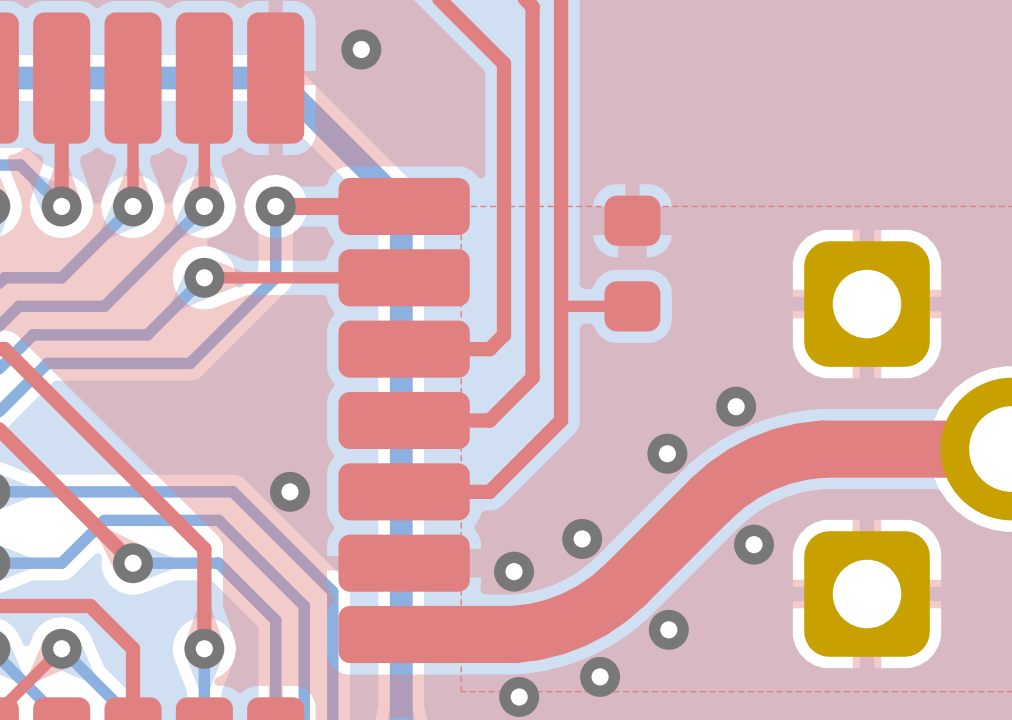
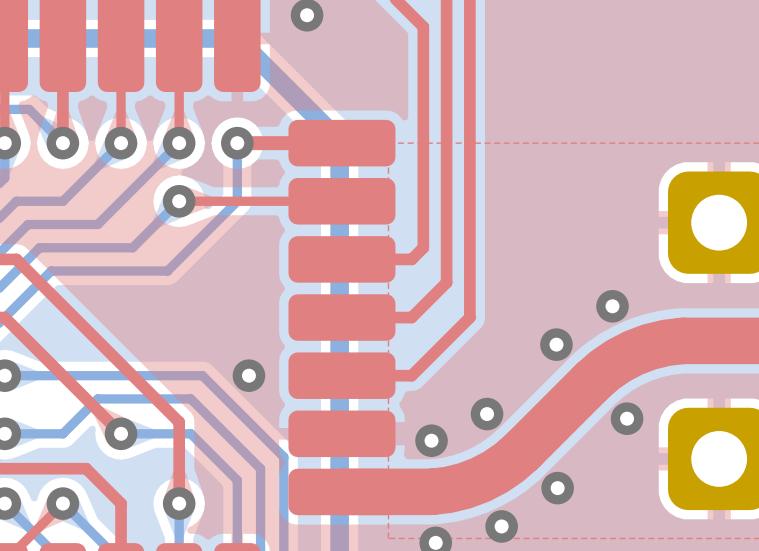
part: (632, 263) -> none
top track: (561, 306) (632, 306) -> none

